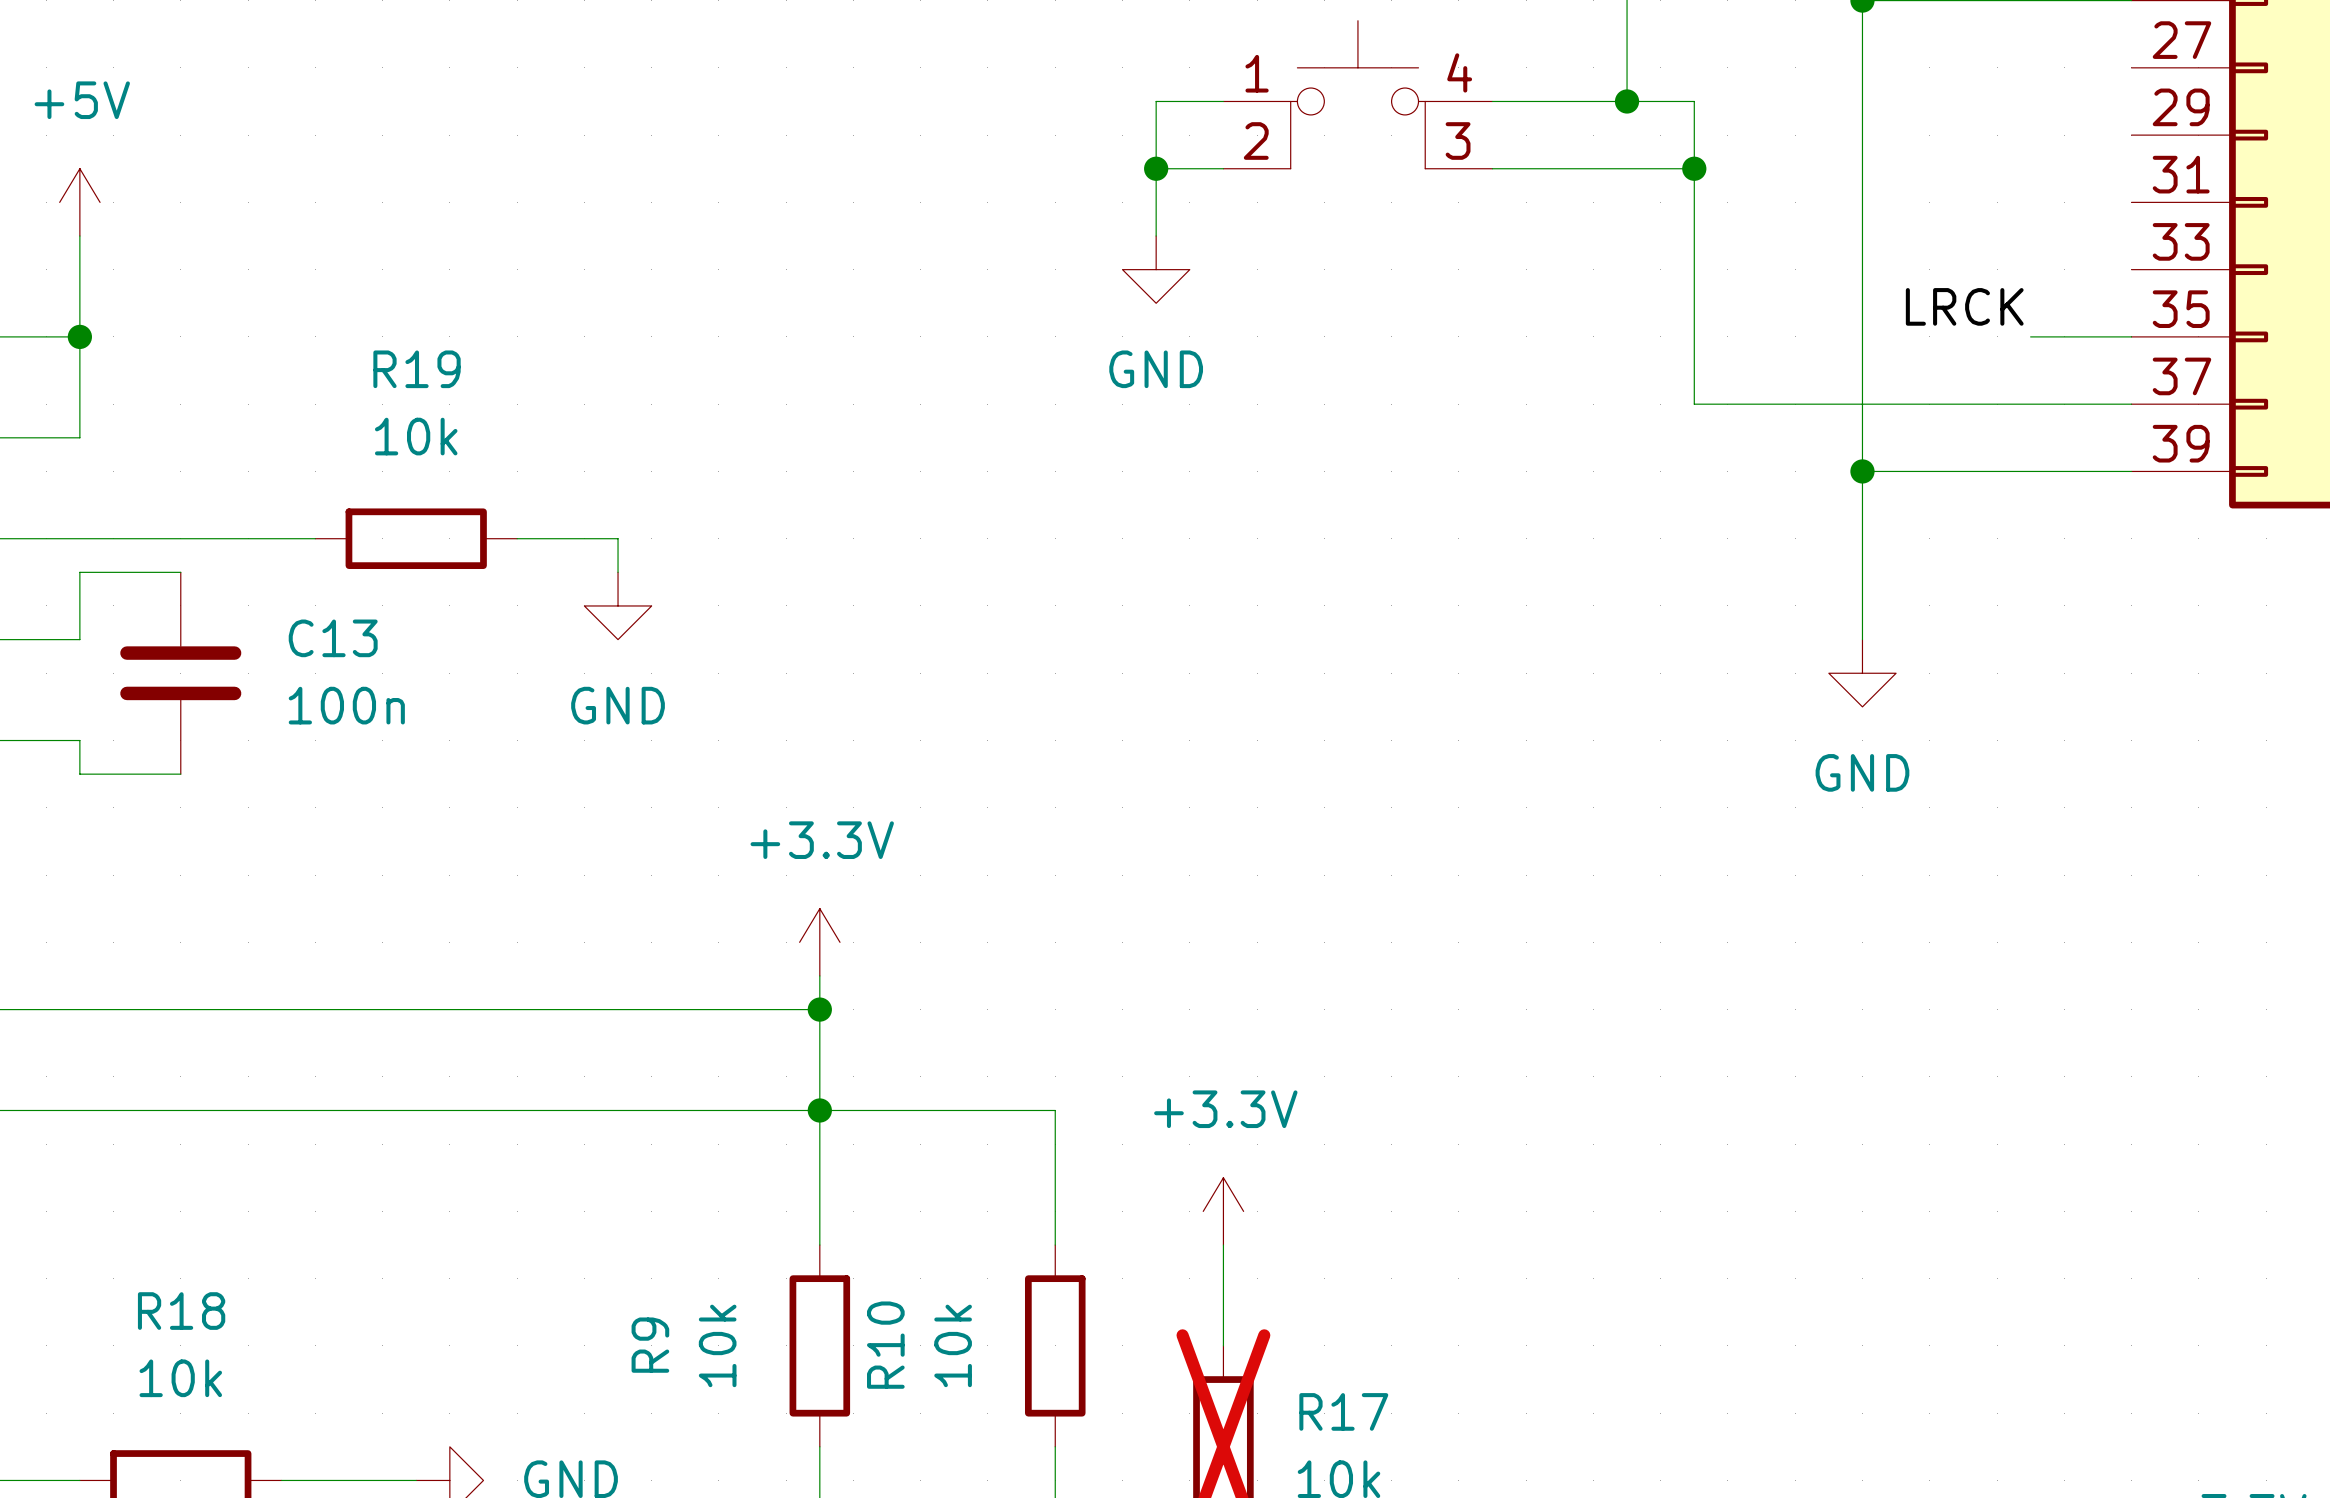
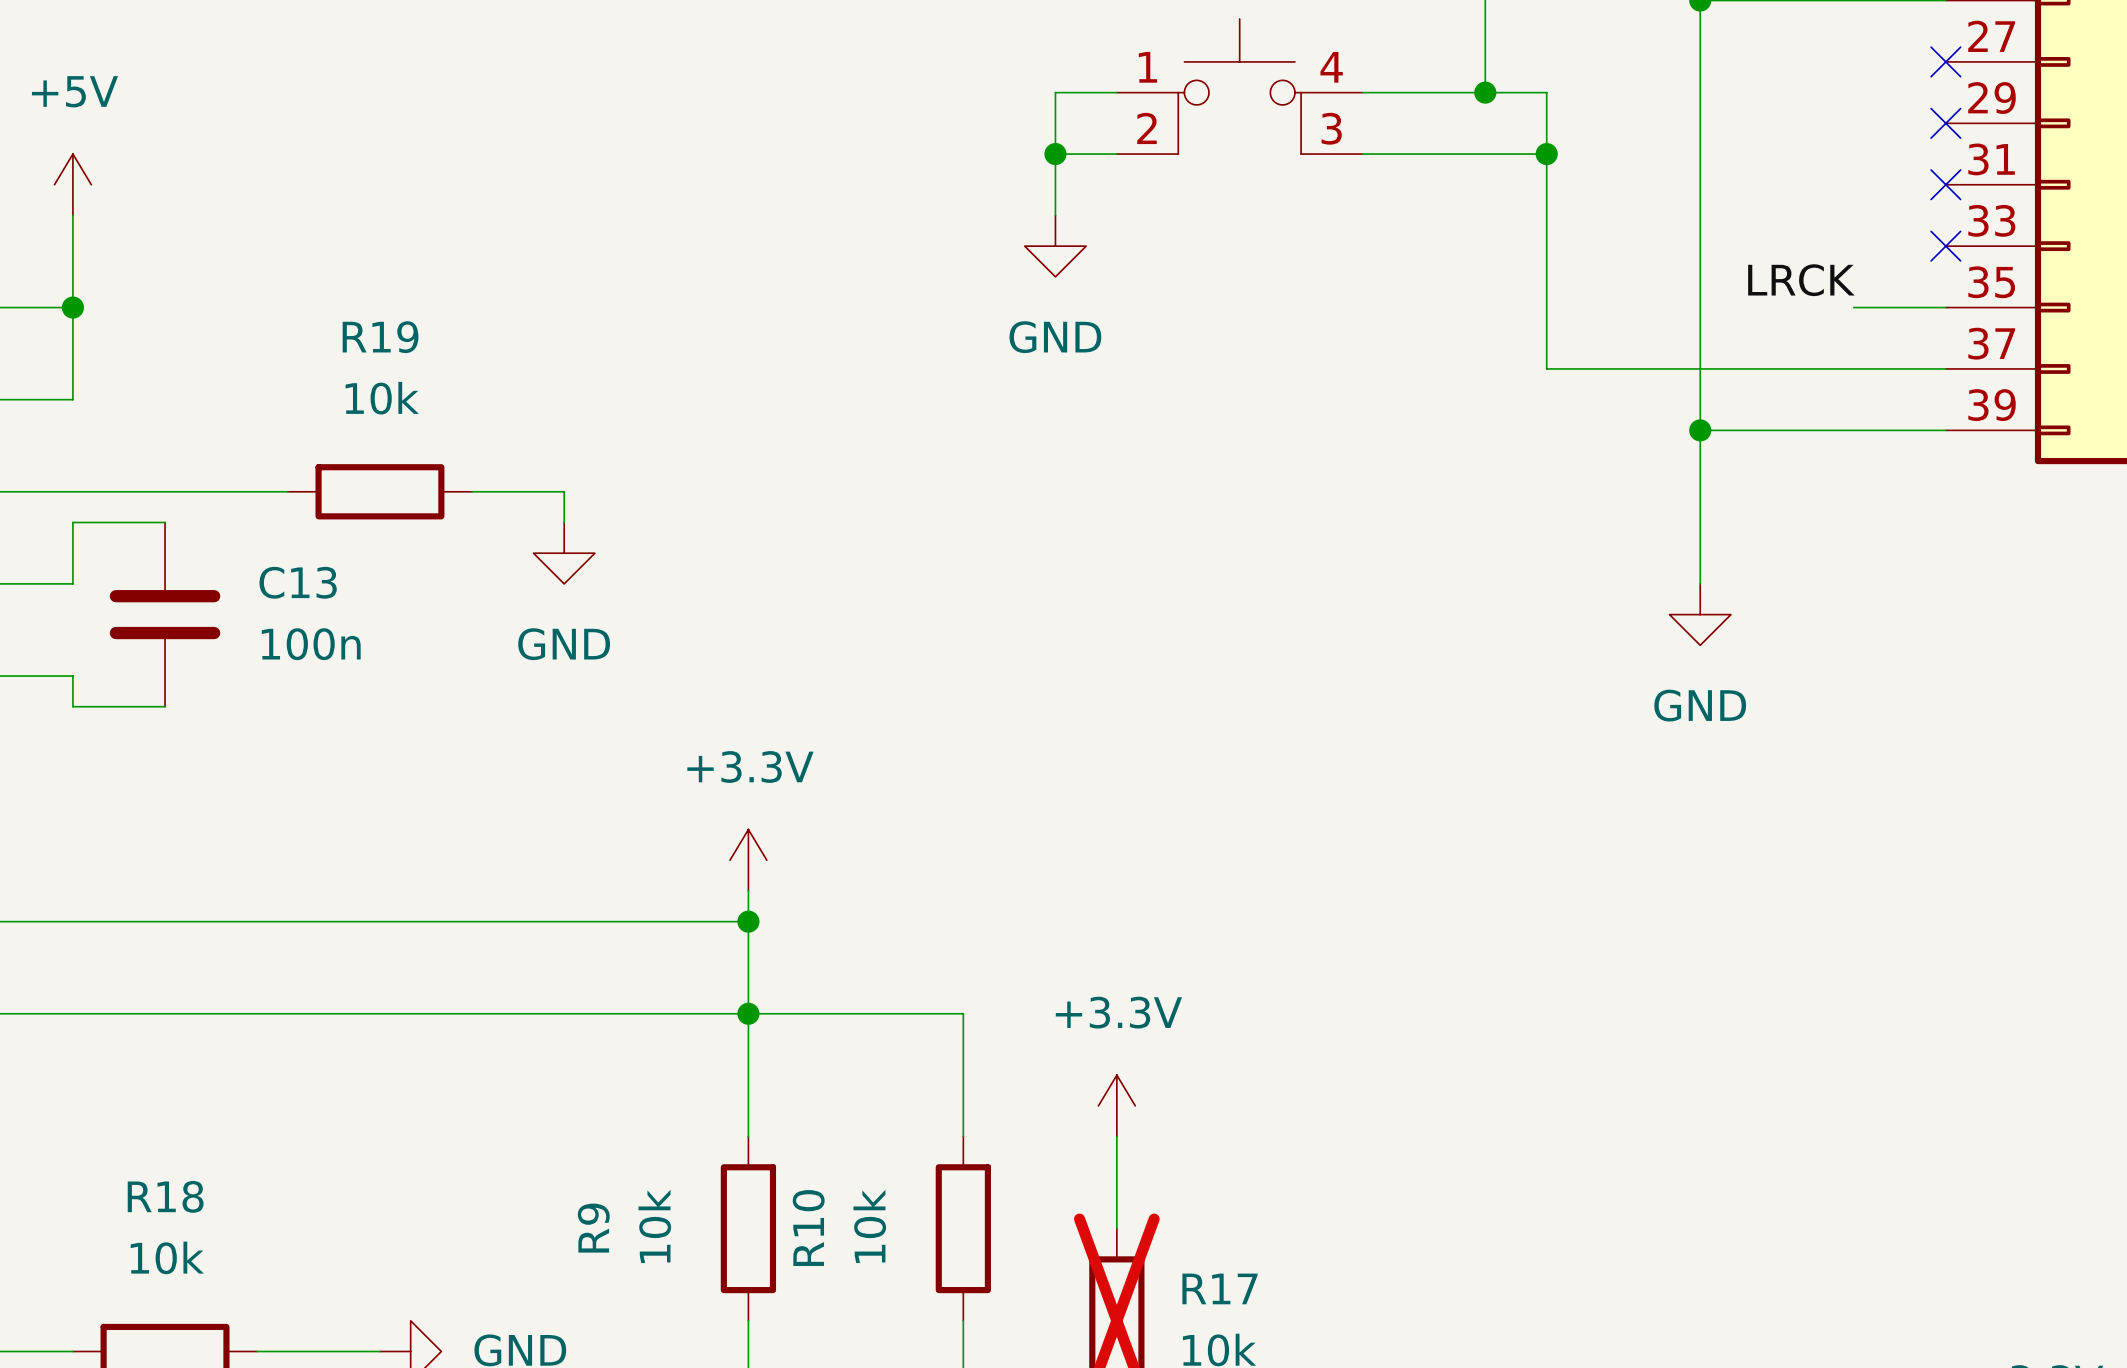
no-connect mark: none -> (1945, 61)
no-connect mark: none -> (1945, 123)
no-connect mark: none -> (1945, 184)
no-connect mark: none -> (1945, 246)

